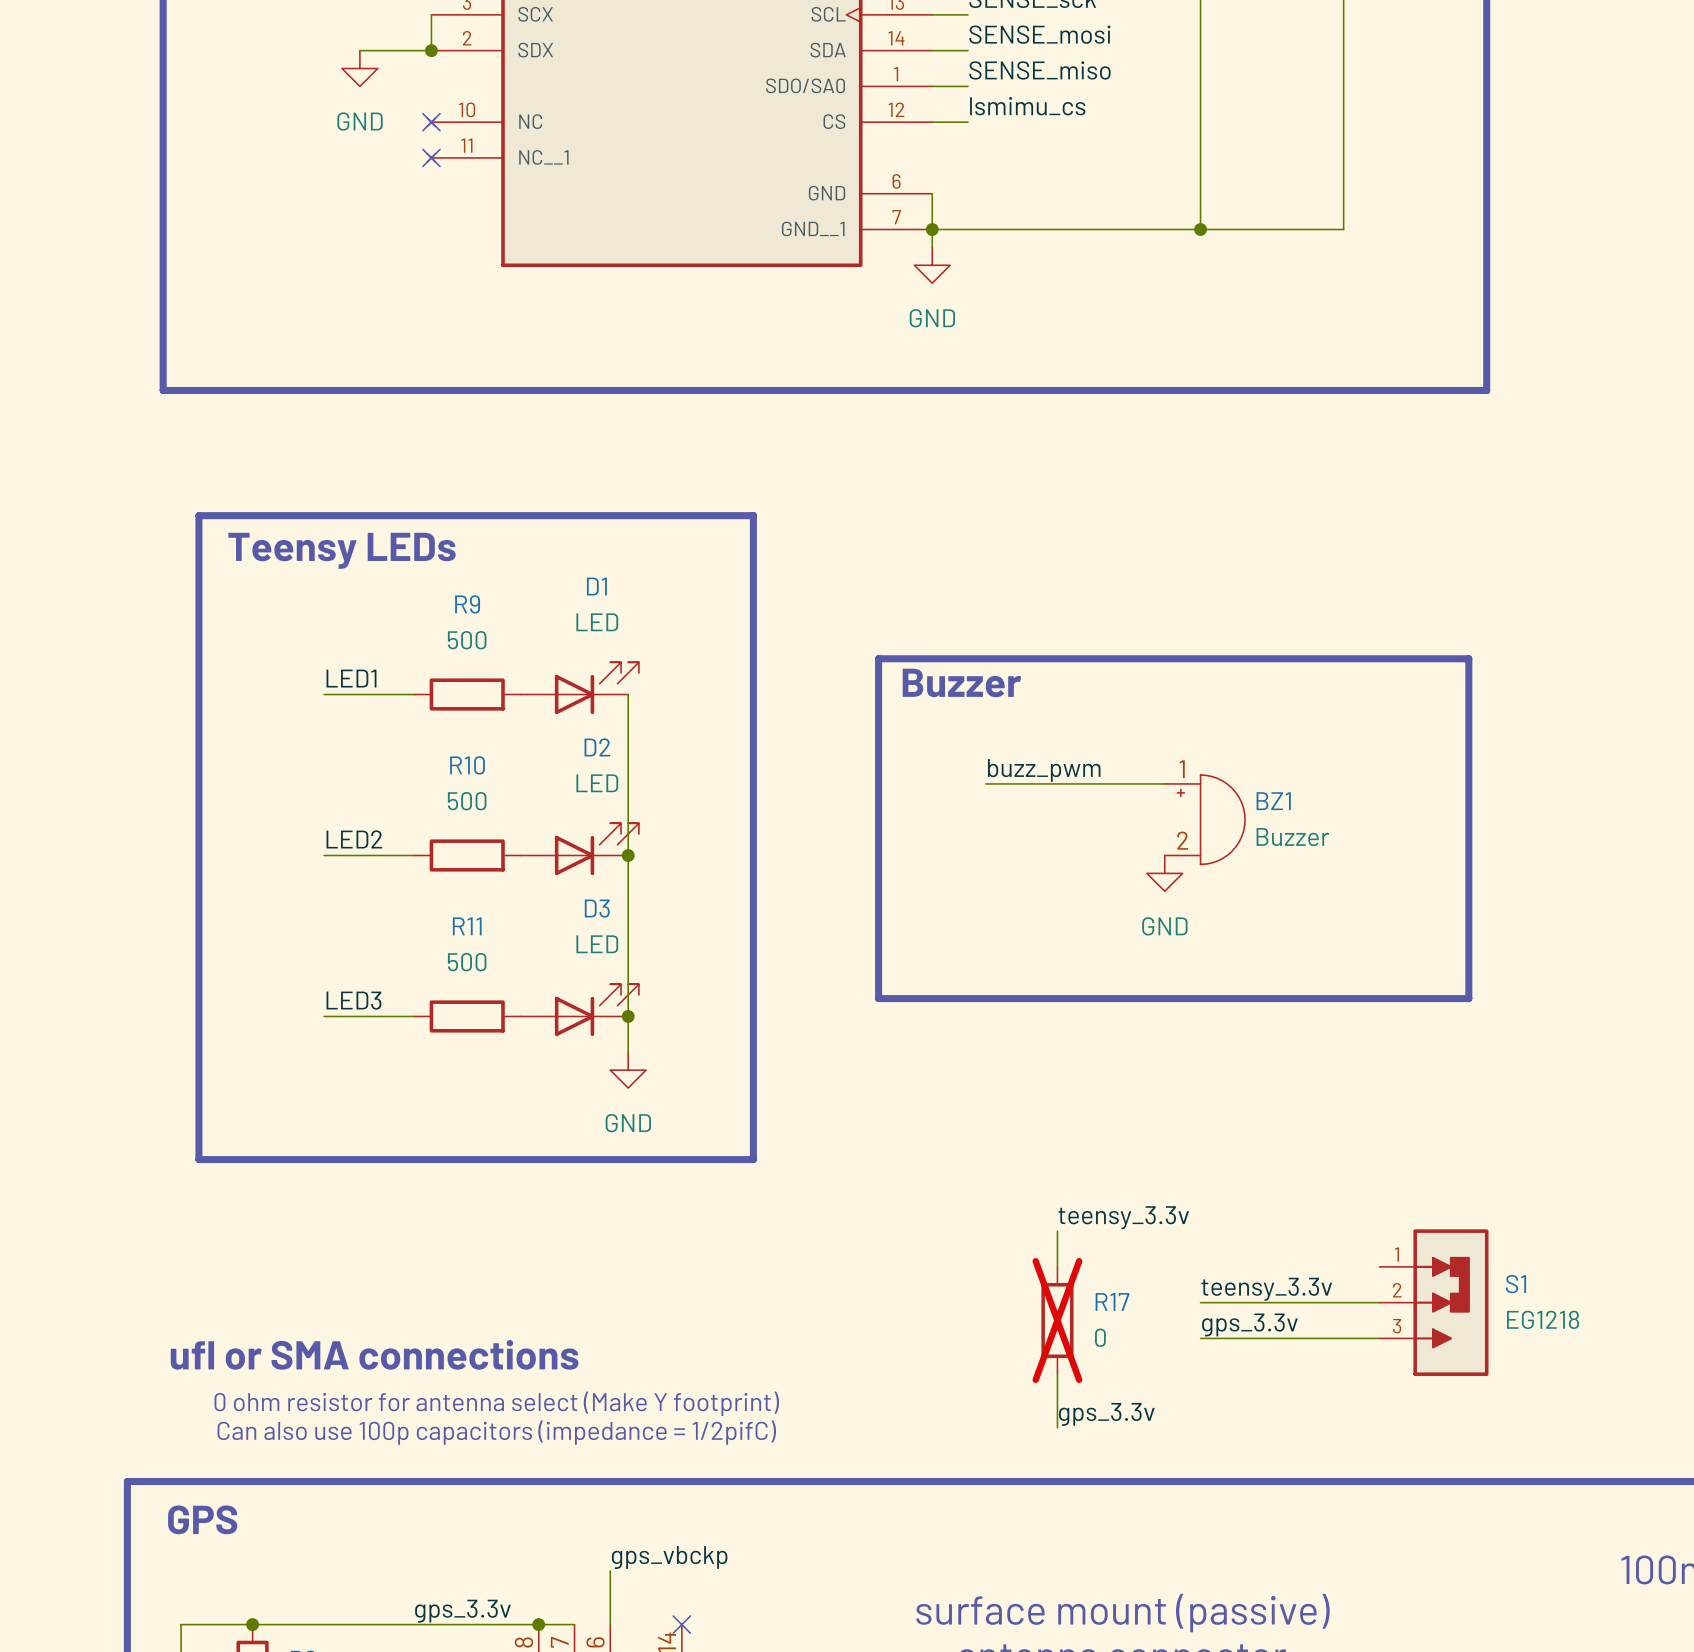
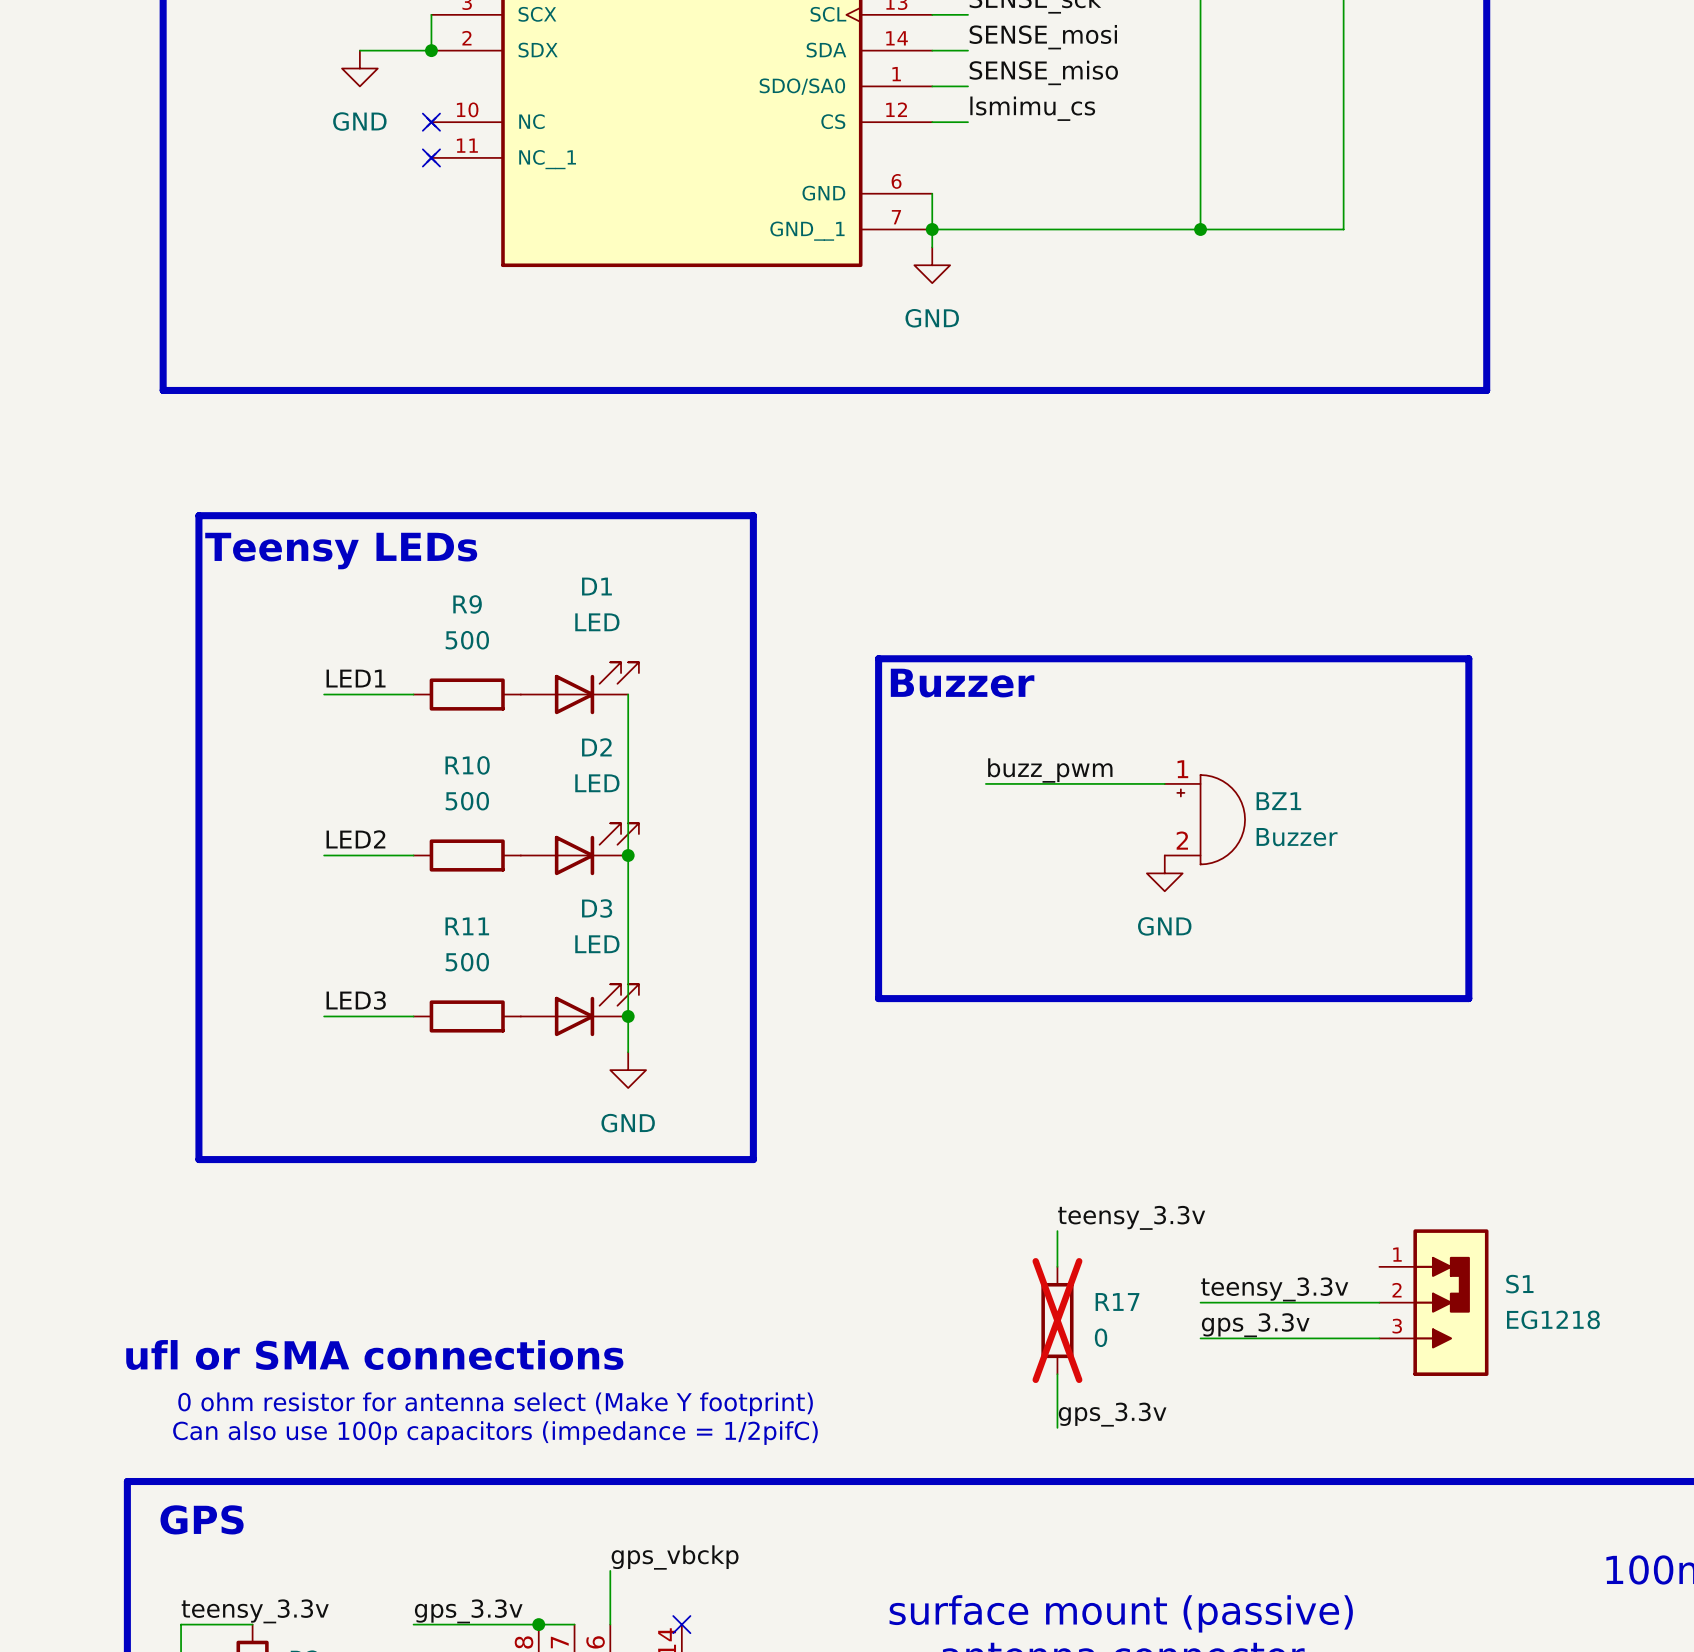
label: none -> teensy_3.3v (255, 1611)
wire: (252, 1624) (413, 1624) -> none
junction: (252, 1624) -> none

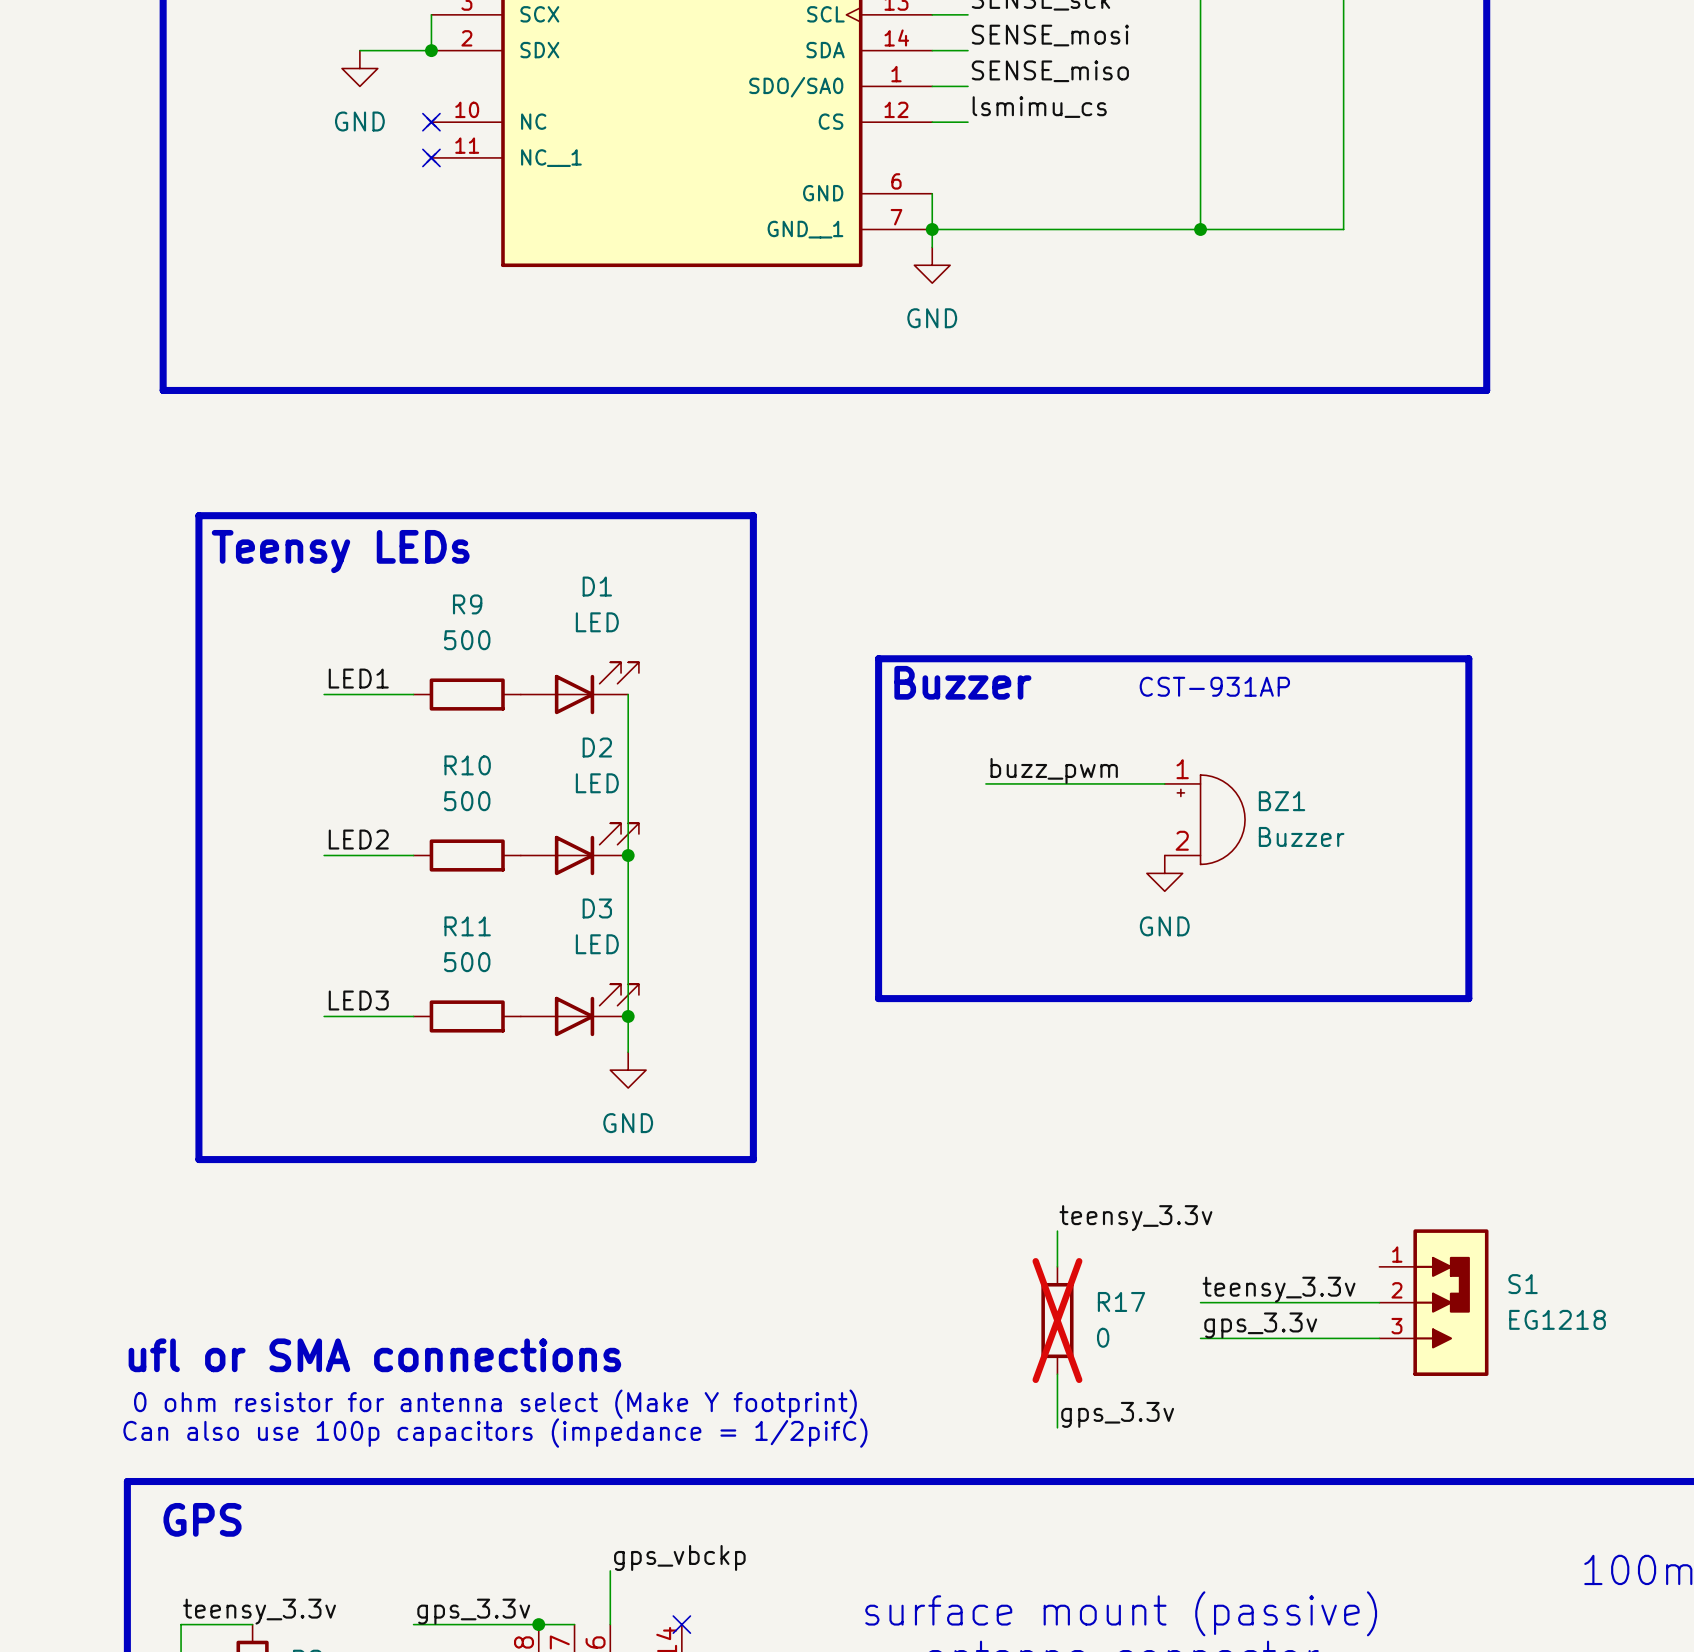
text: none -> CST-931AP (1214, 686)

